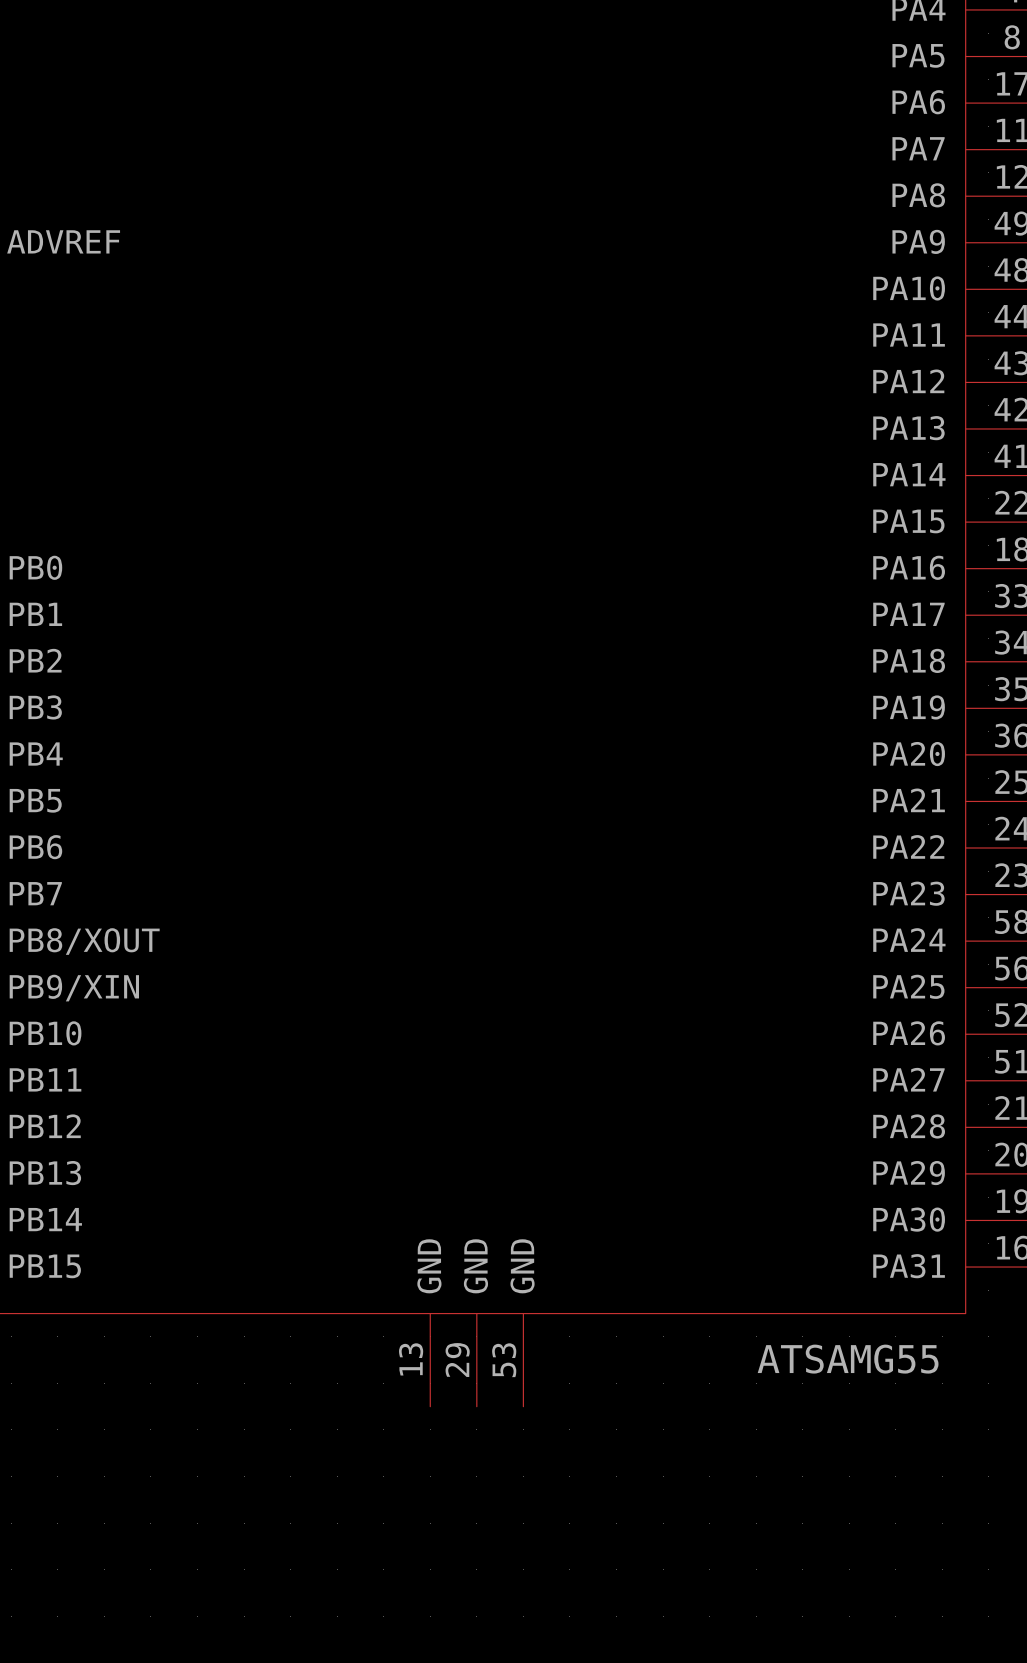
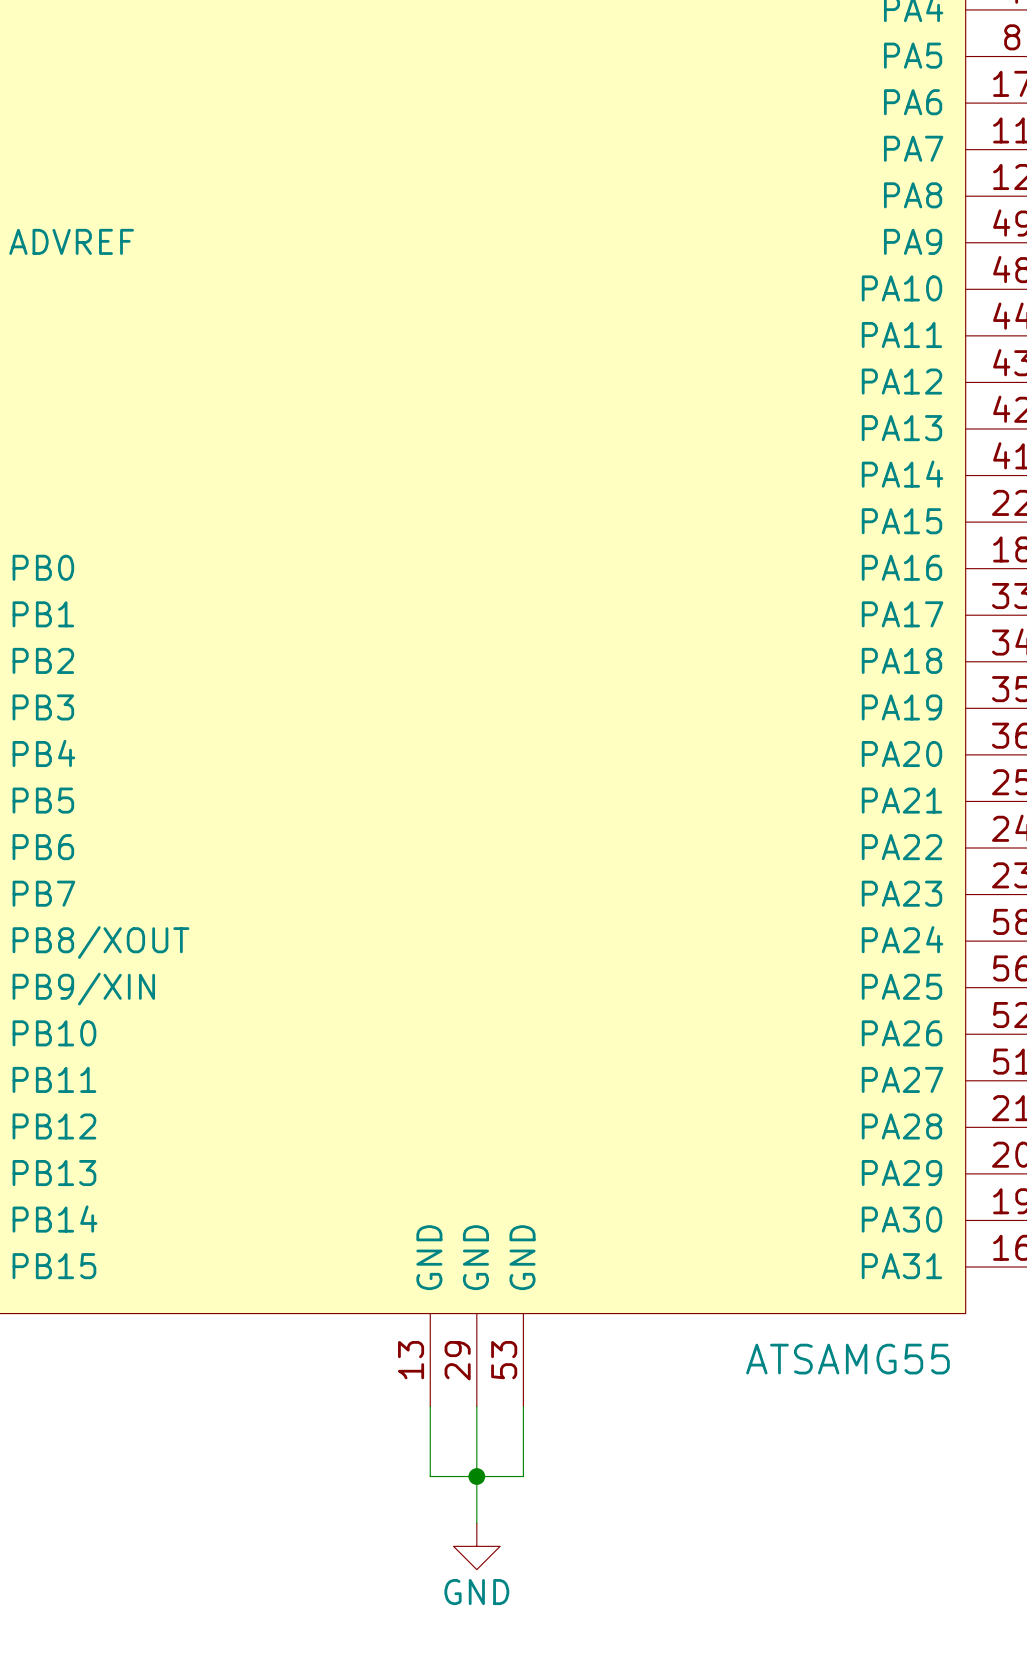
wire: none -> (430, 1406) (430, 1476) (523, 1476) (523, 1406)
wire: none -> (476, 1406) (476, 1523)
junction: none -> (476, 1476)
power symbol: none -> GND (476, 1546)

